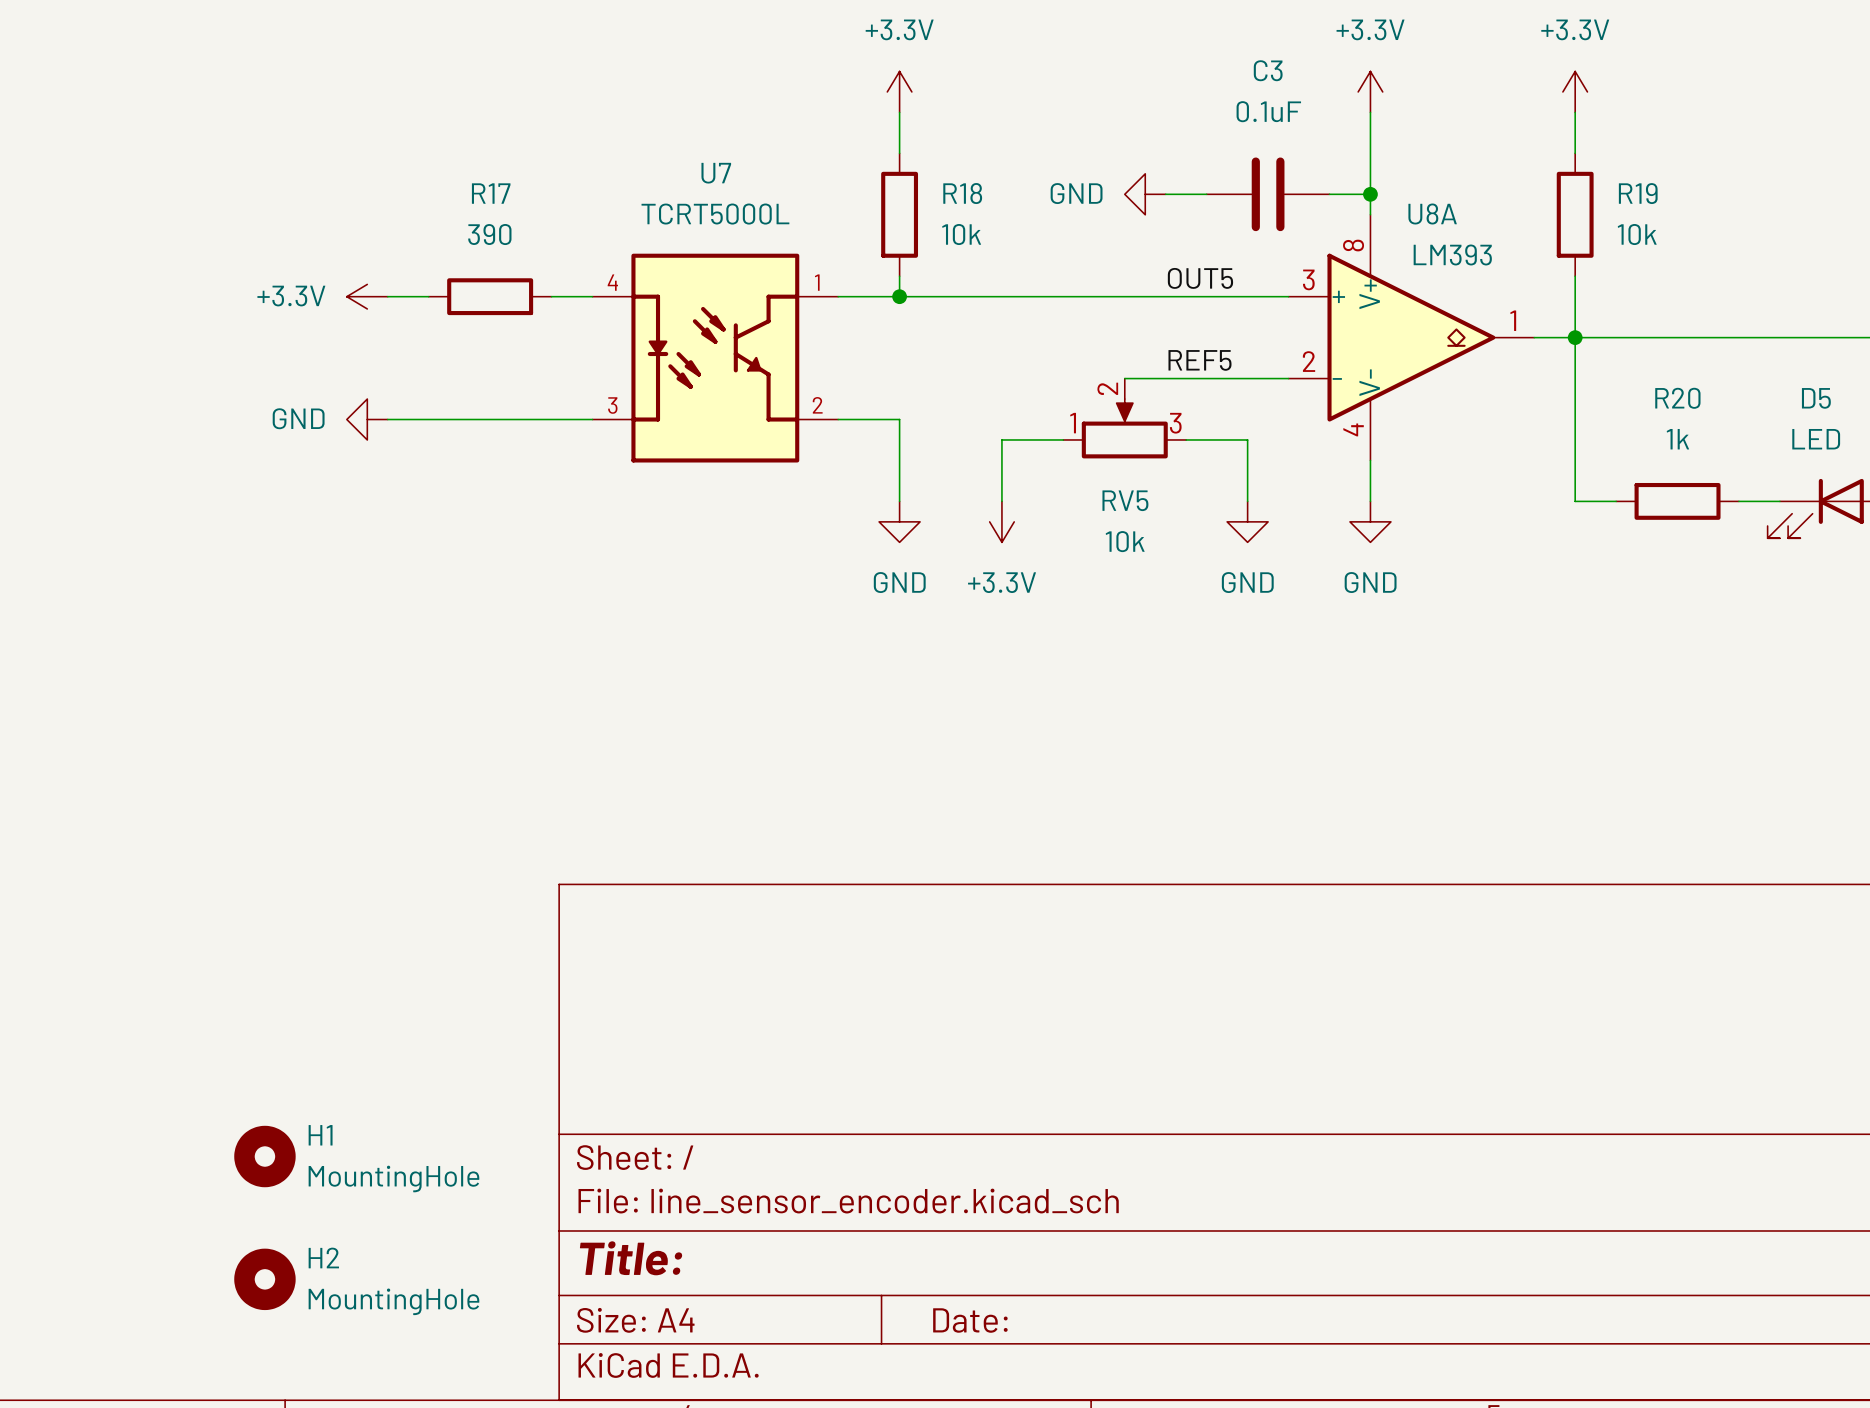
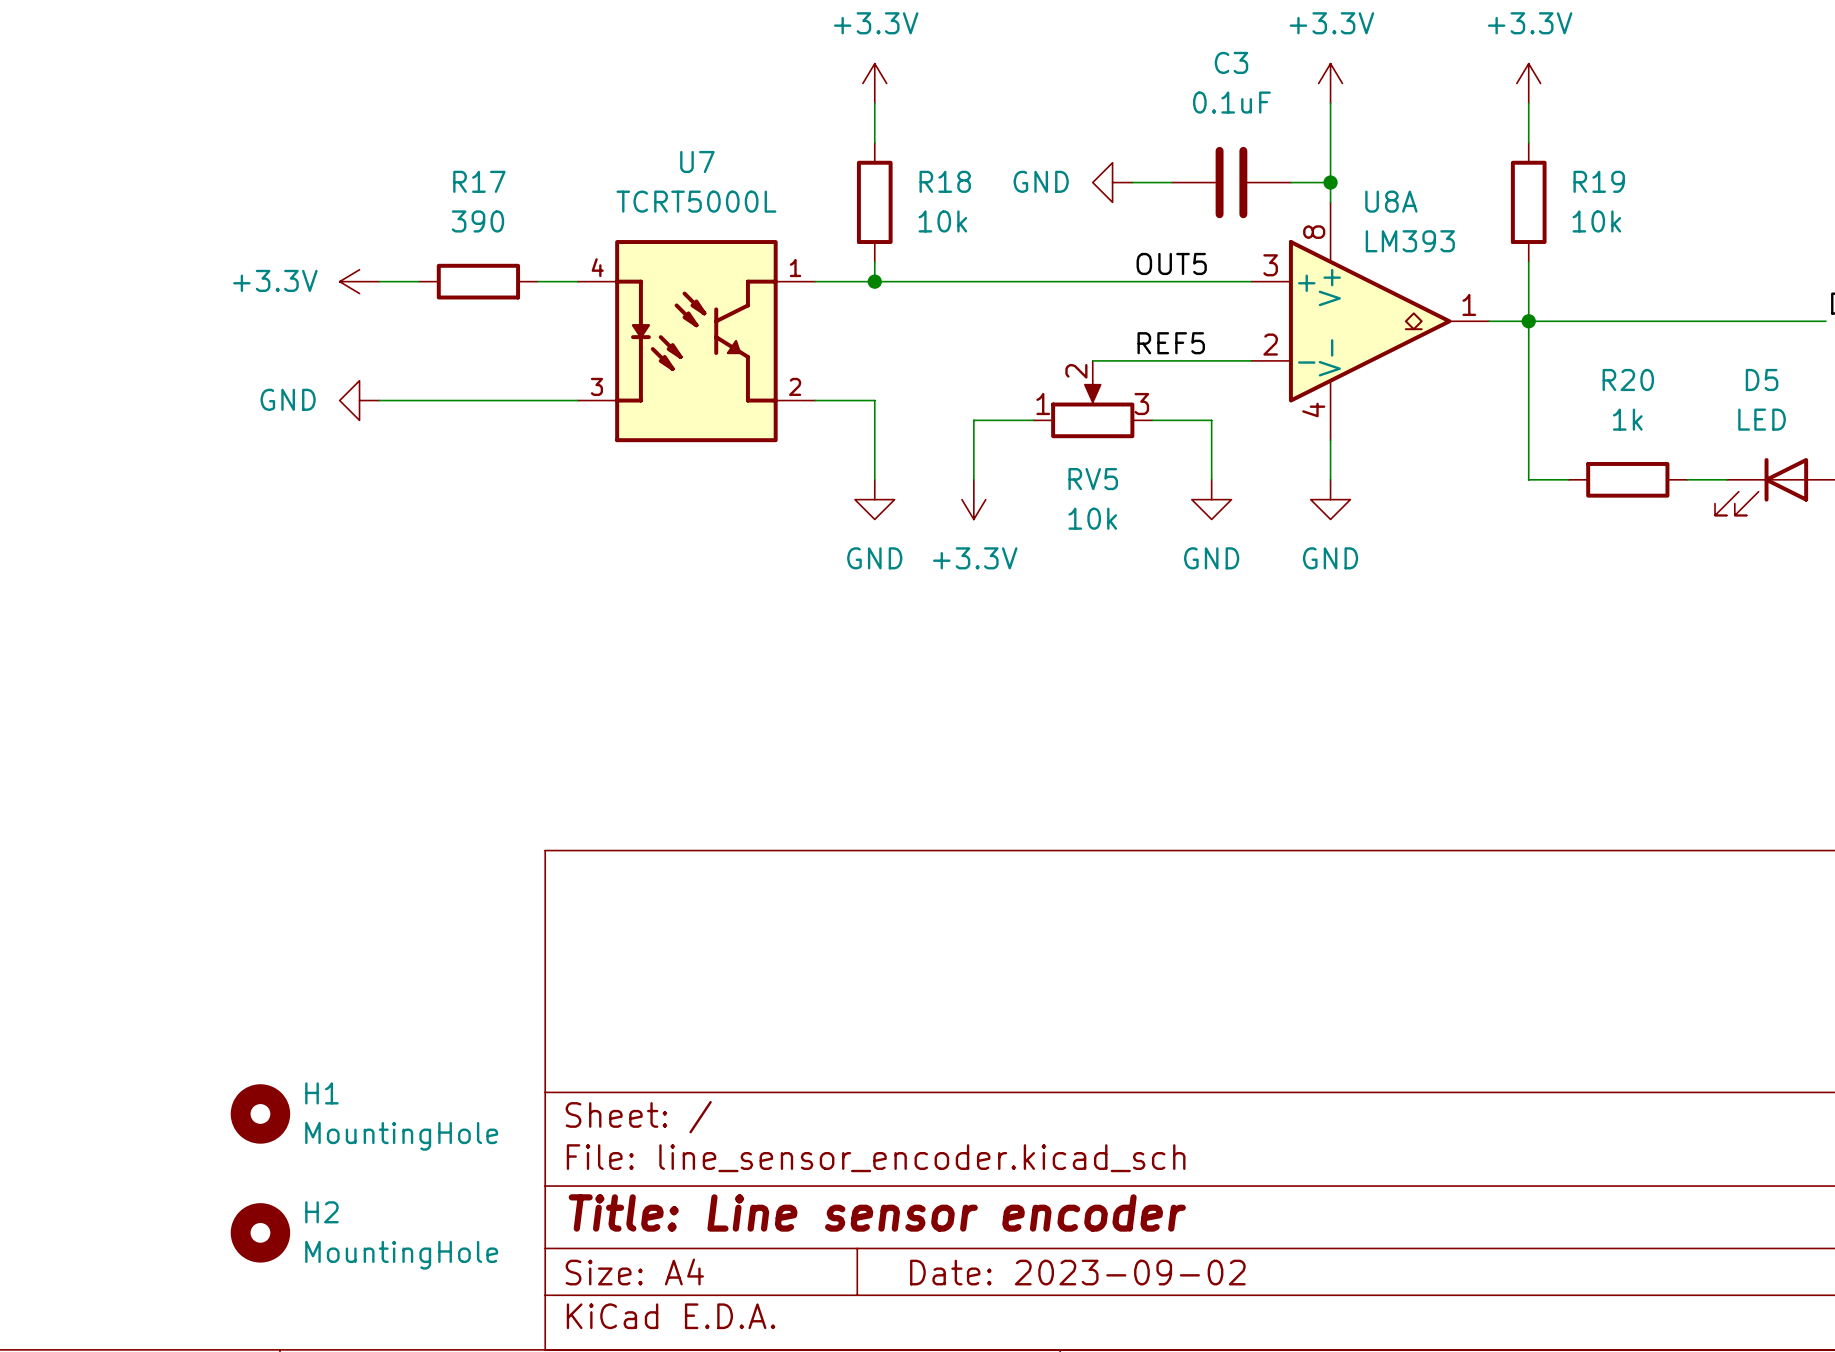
title block: Title: (631, 1258) -> Title: Line sensor encoder (877, 1212)
title block: Date: (970, 1320) -> Date: 2023-09-02 (1077, 1272)

